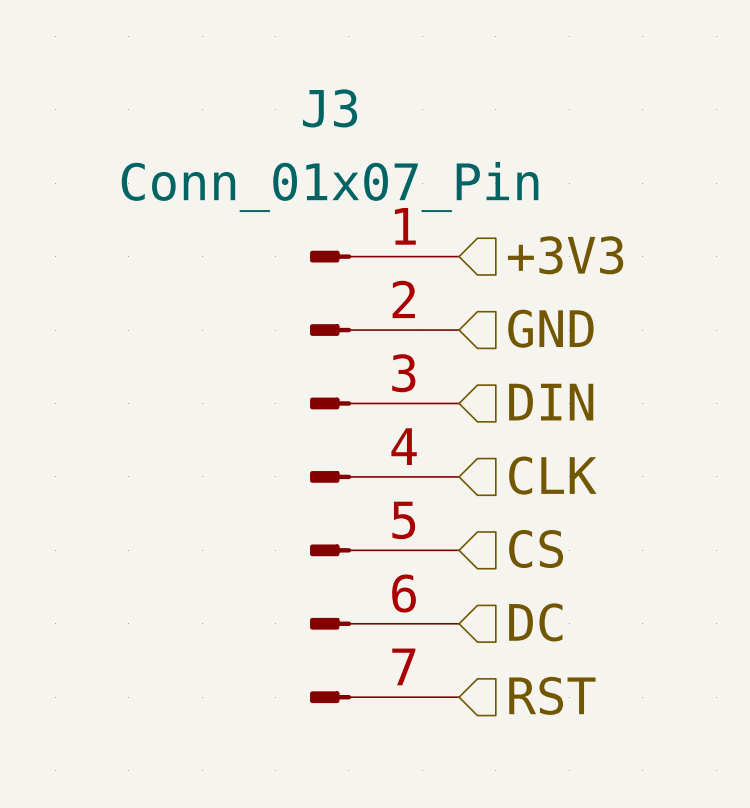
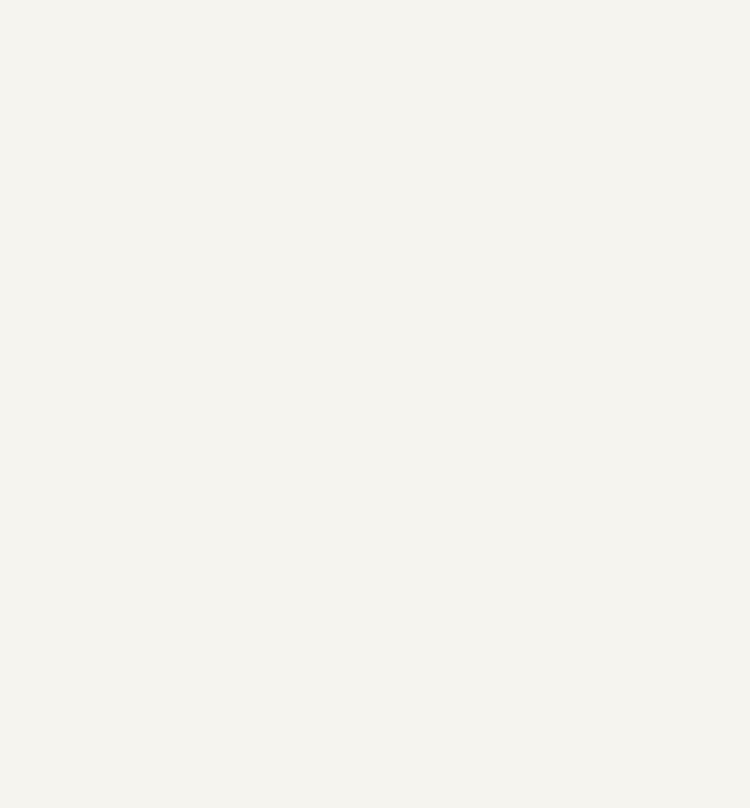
hierarchical label: +3V3 (565, 255) -> none
hierarchical label: GND (550, 328) -> none
hierarchical label: DIN (551, 402) -> none
hierarchical label: CLK (552, 475) -> none
J3: Conn_01x07_Pin (384, 476) -> none
hierarchical label: CS (536, 549) -> none
hierarchical label: DC (535, 622) -> none
hierarchical label: RST (552, 695) -> none

